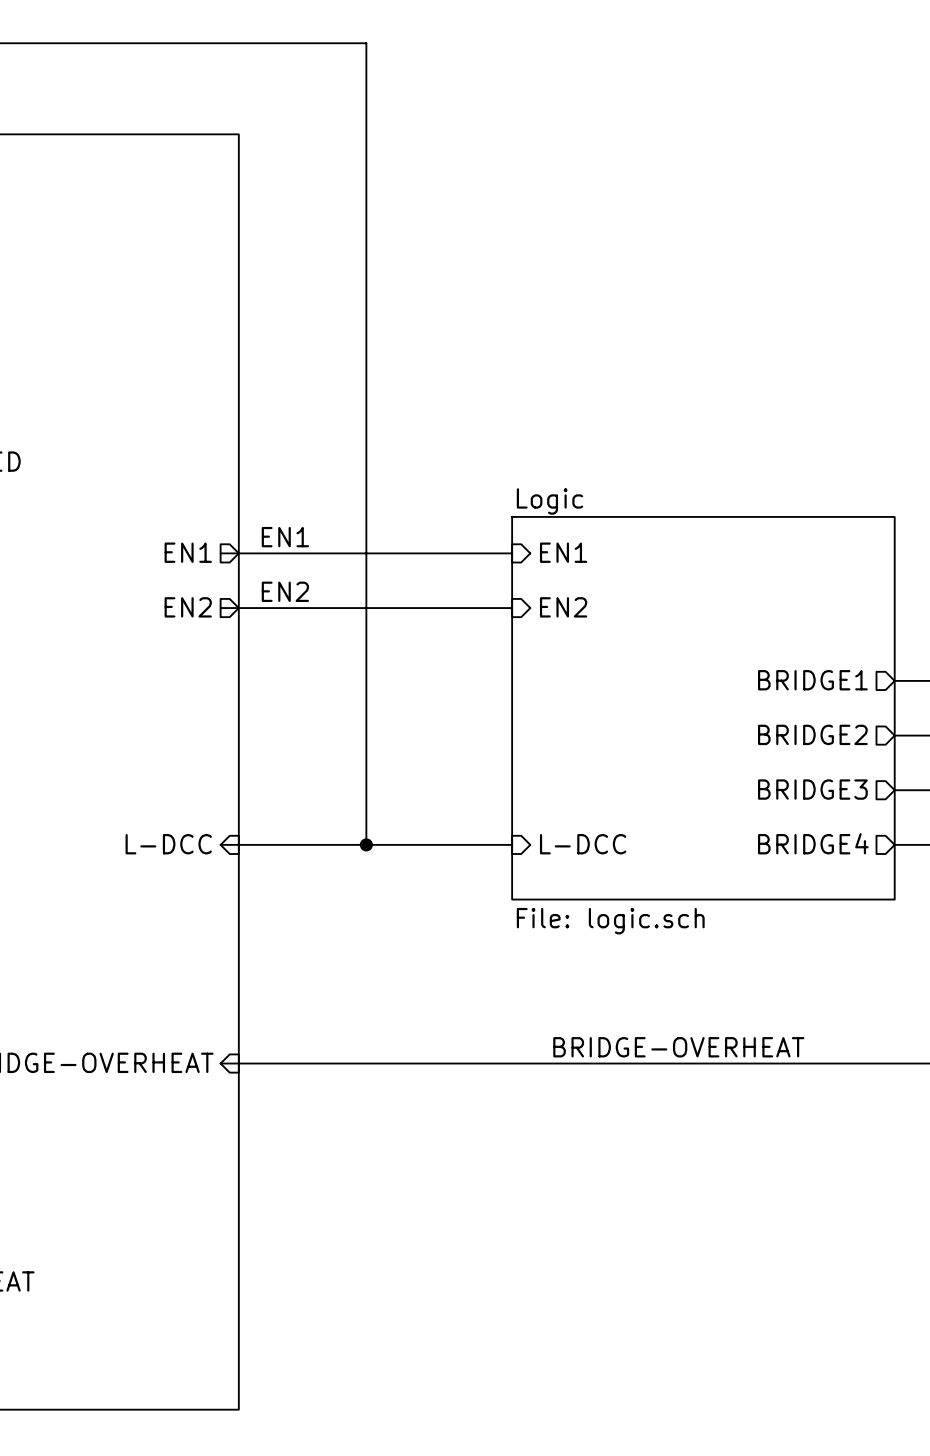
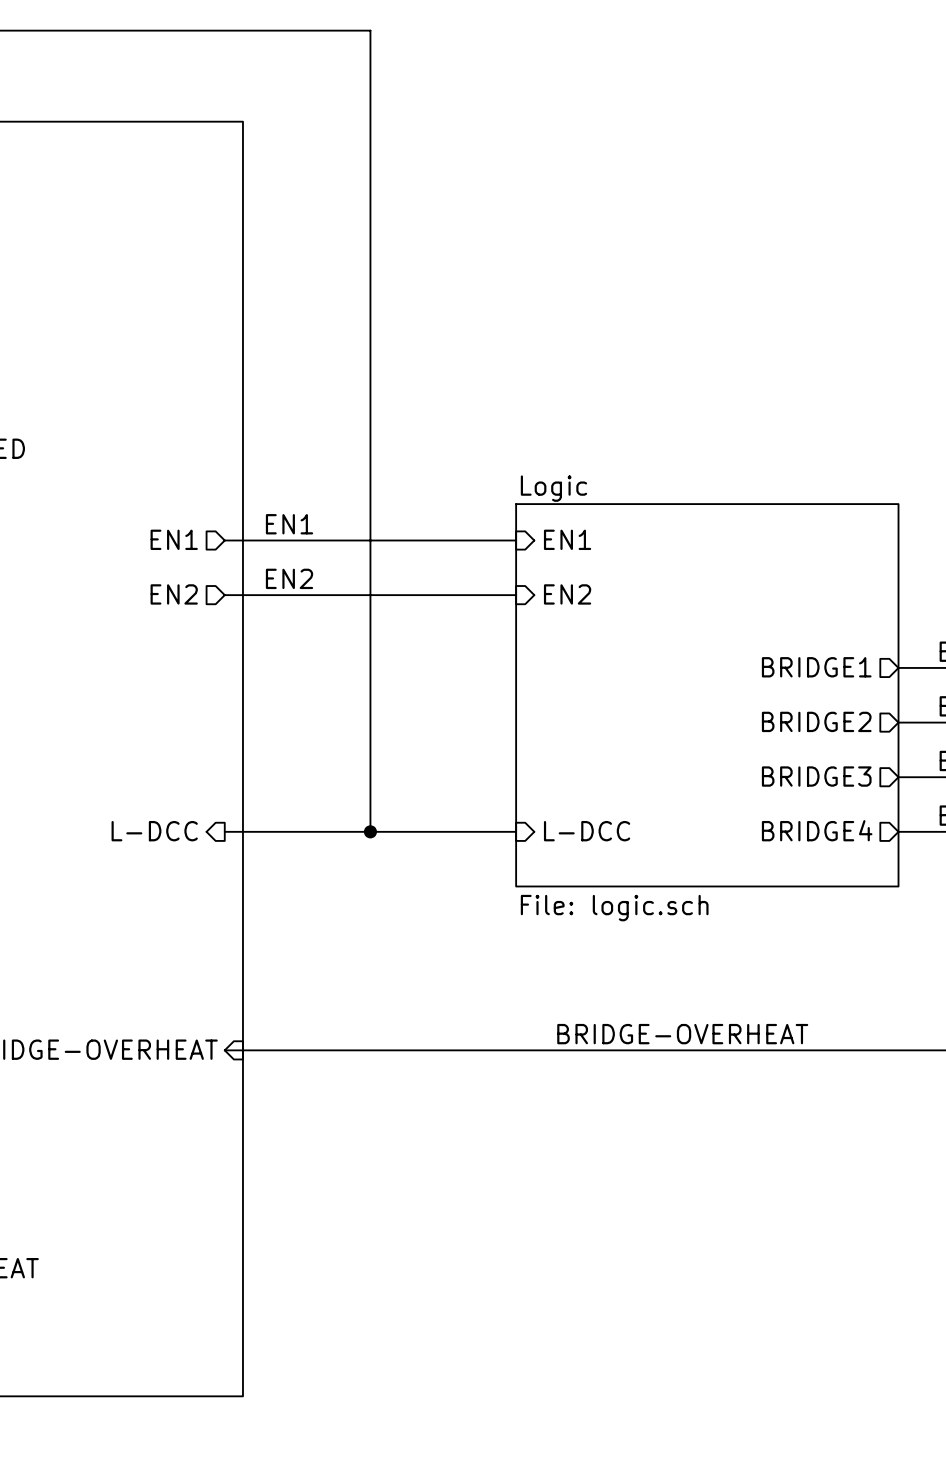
sheet pin position: EN1 (188, 552) -> EN1 (174, 539)
sheet pin position: EN2 (188, 607) -> EN2 (174, 594)
sheet pin position: L-DCC (168, 844) -> L-DCC (154, 831)

